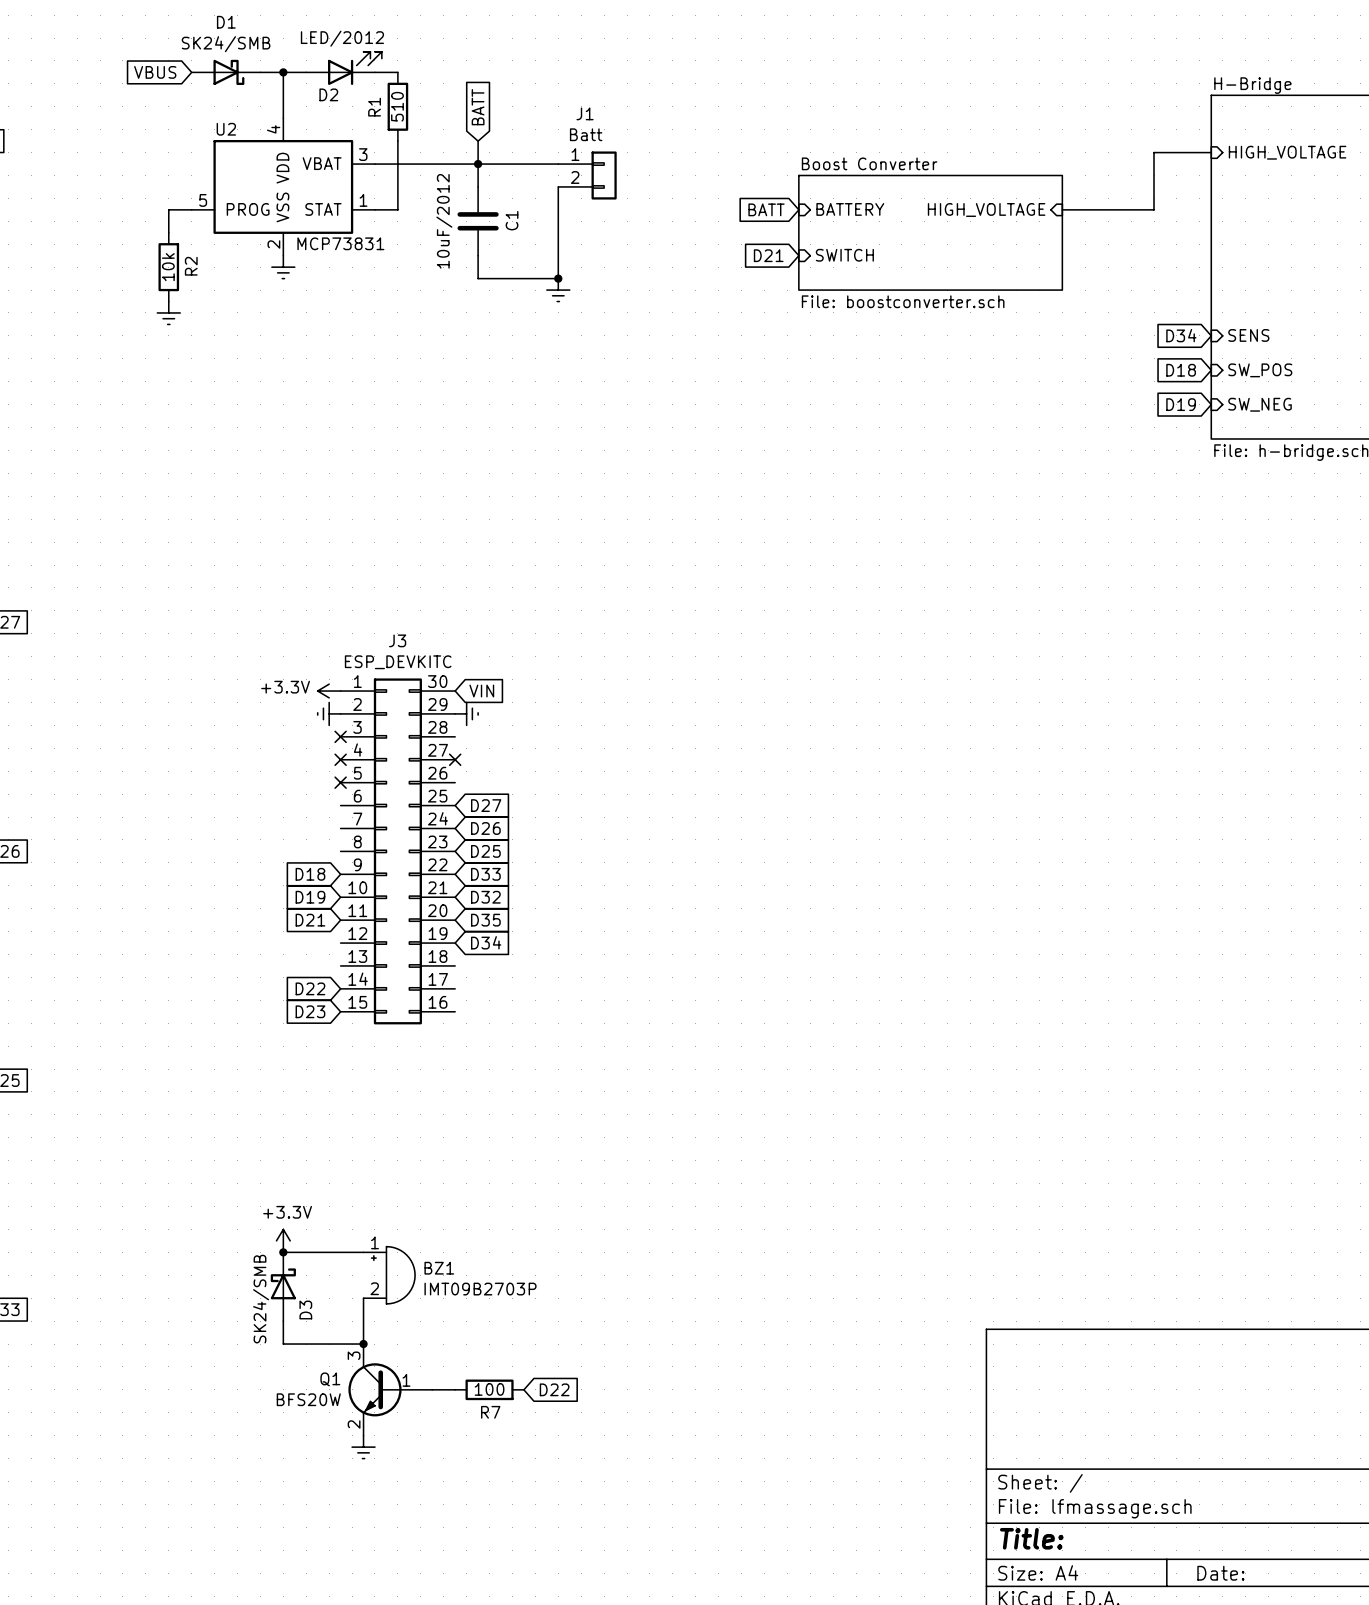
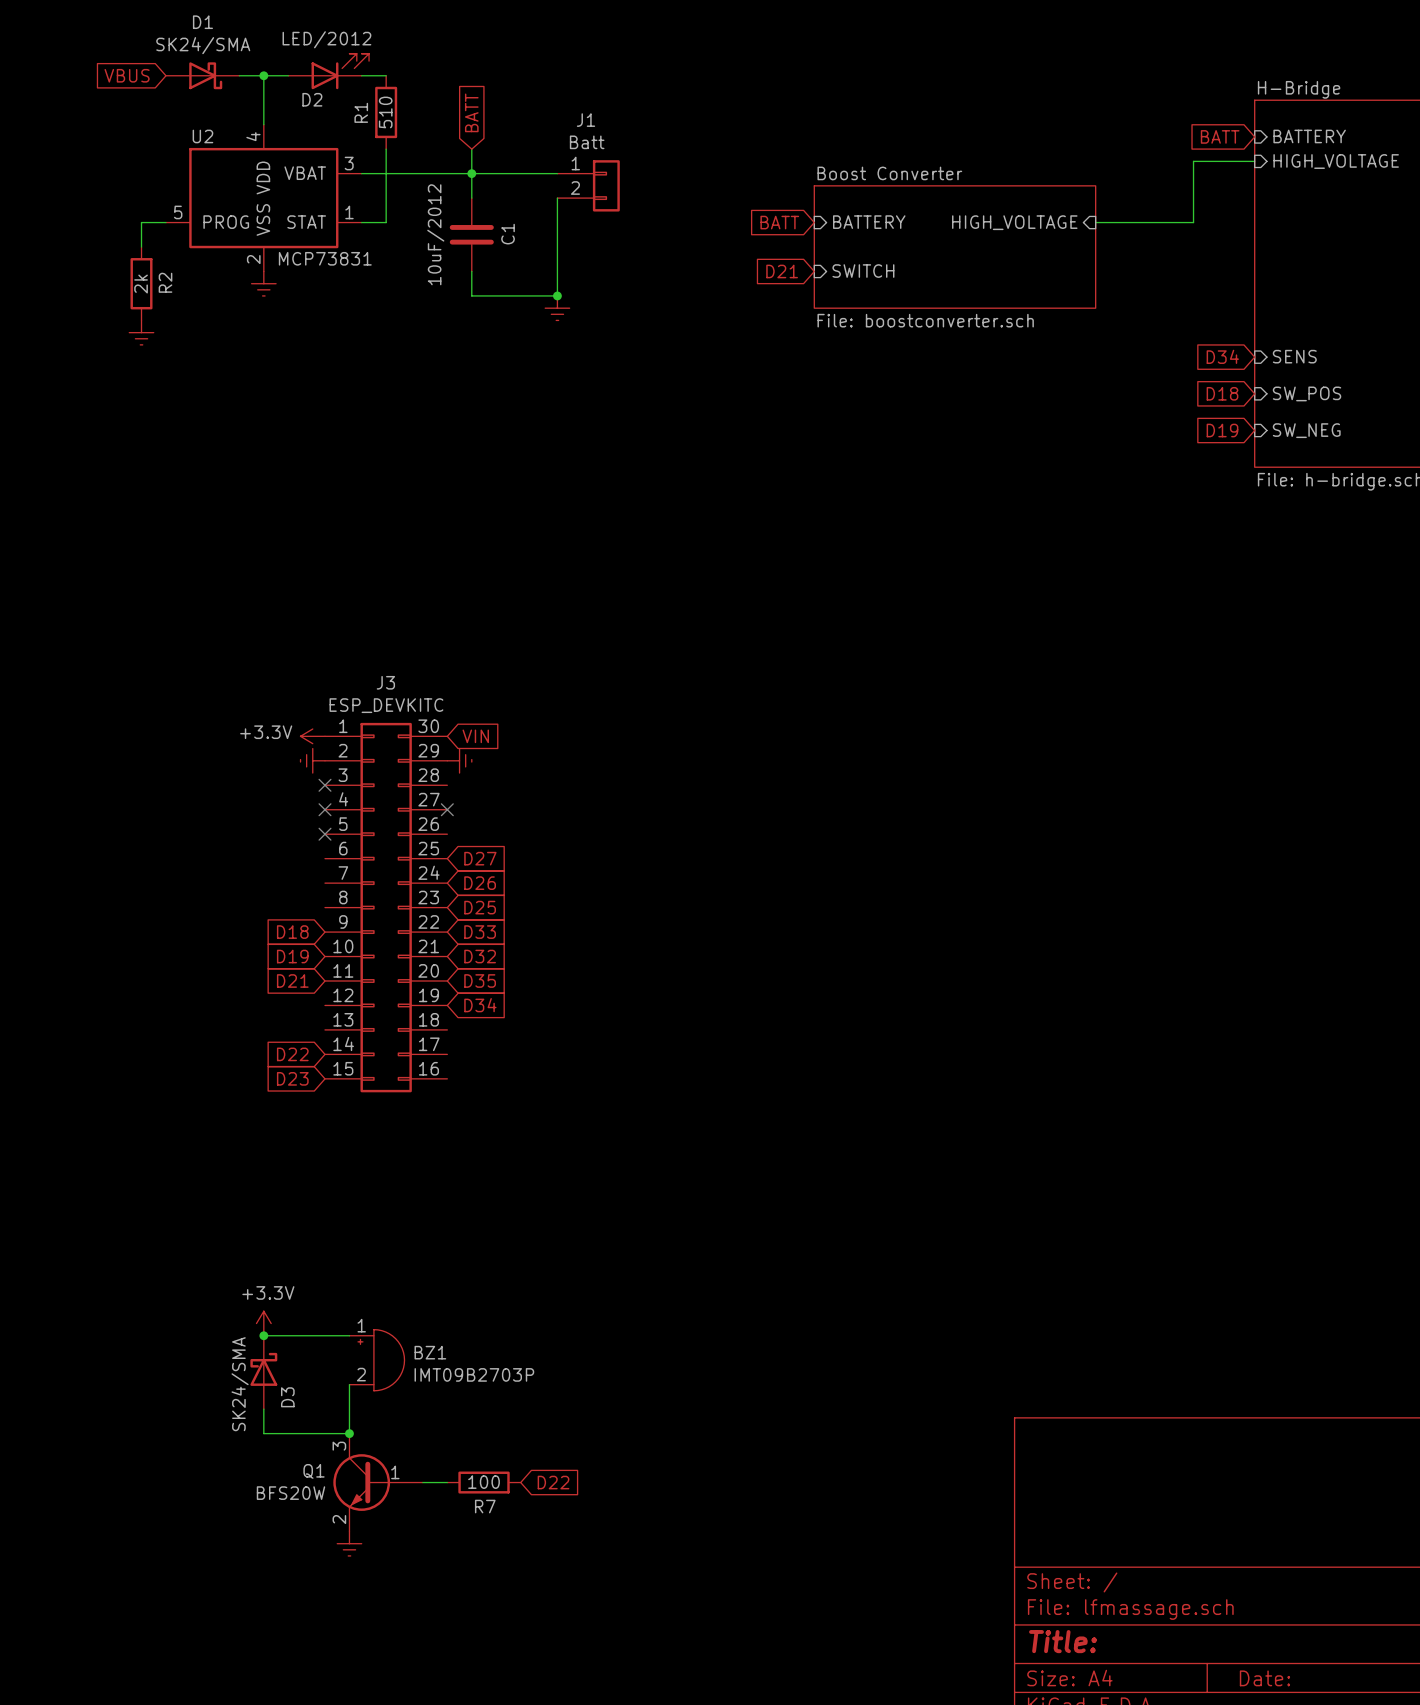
D1 value: SK24/SMB (226, 44) -> SK24/SMA (203, 45)
global label: none -> BATT (1220, 136)
sheet pin: none -> BATTERY (1309, 136)
R2 value: 10k (168, 267) -> 2k (141, 284)
D3 value: SK24/SMB (261, 1299) -> SK24/SMA (240, 1384)

